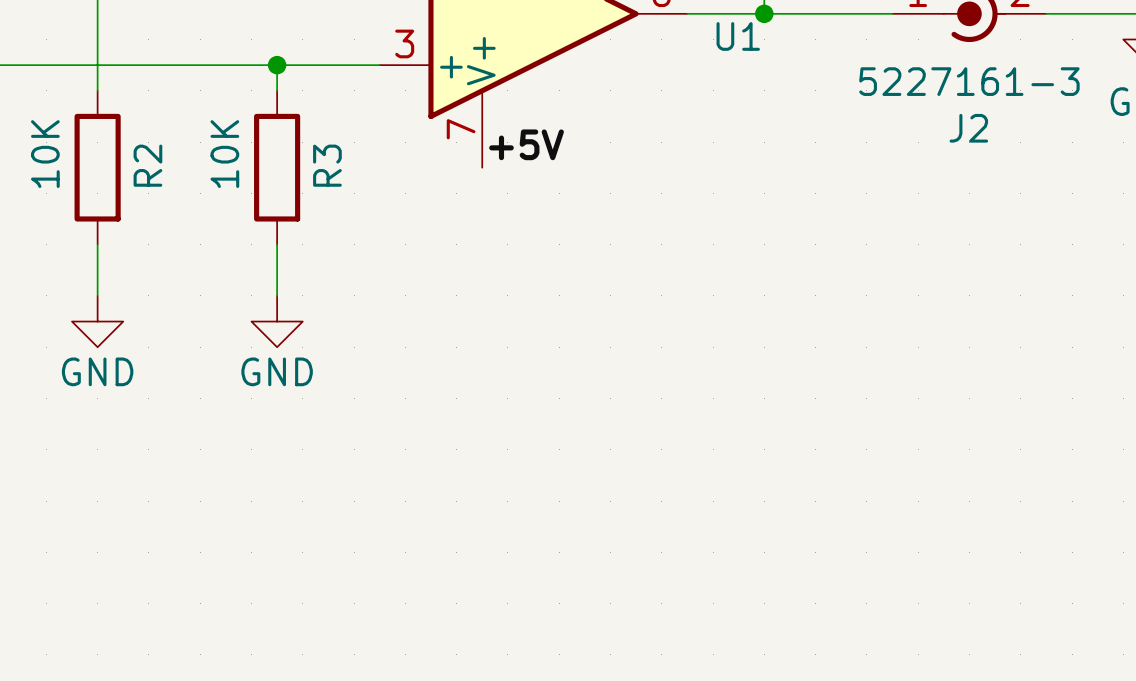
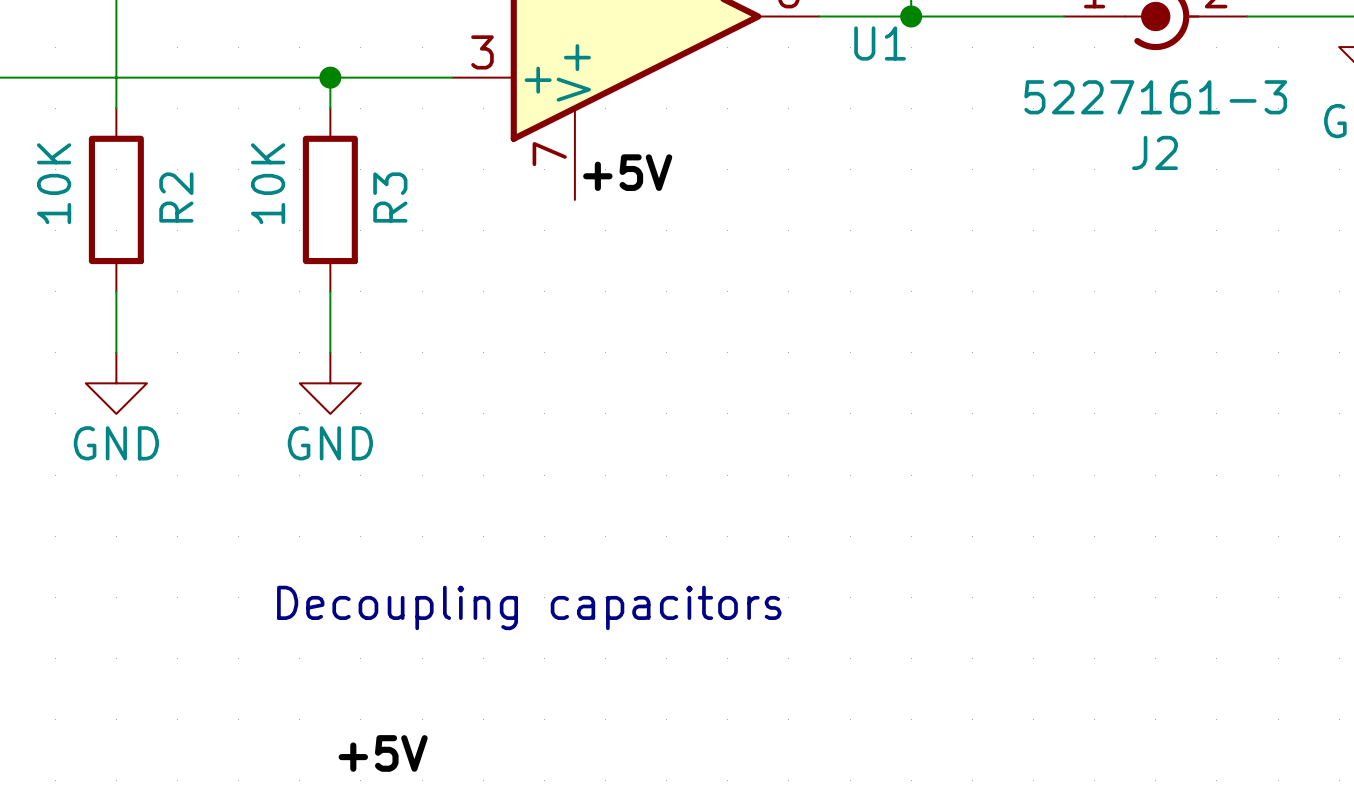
text: none -> Decoupling capacitors (529, 607)
label: none -> +5V (383, 753)

